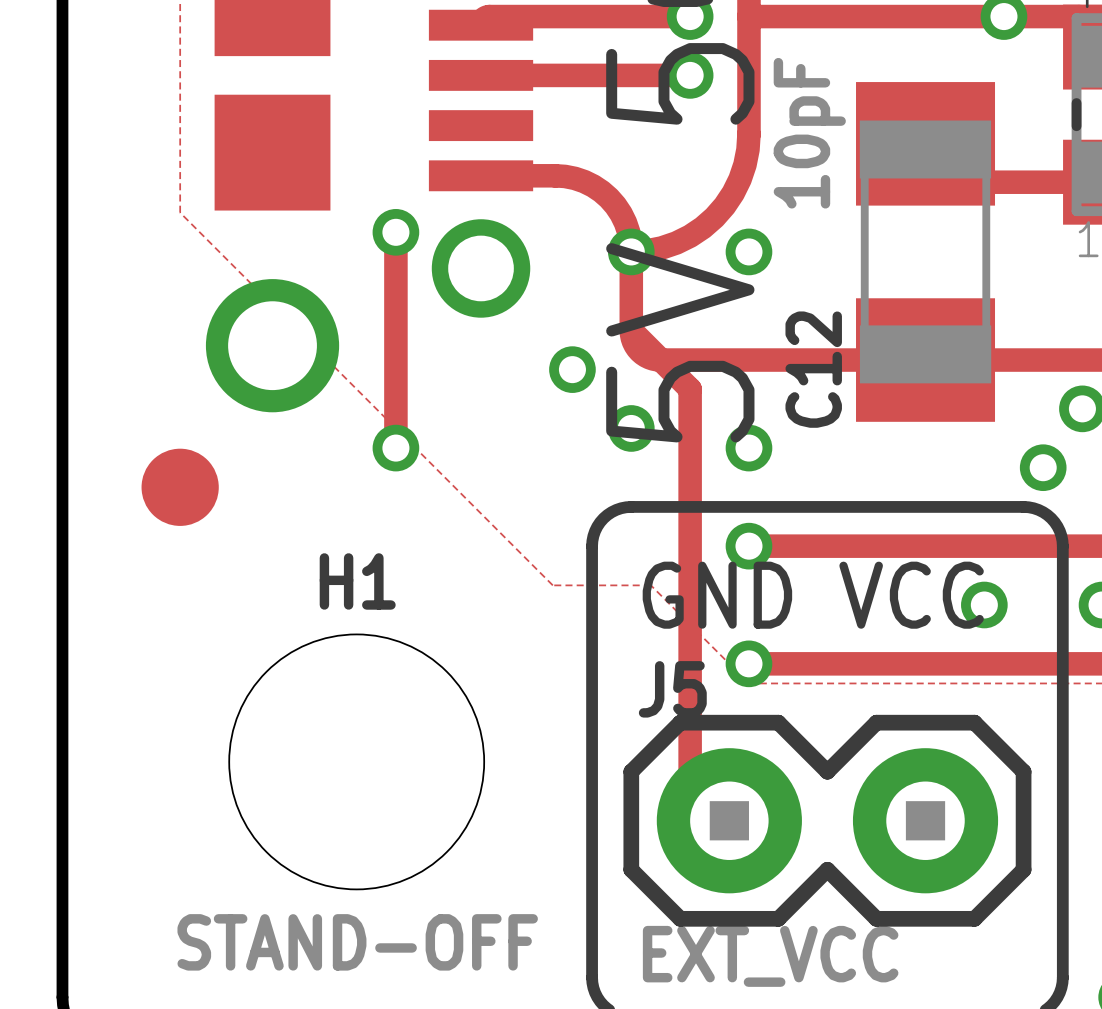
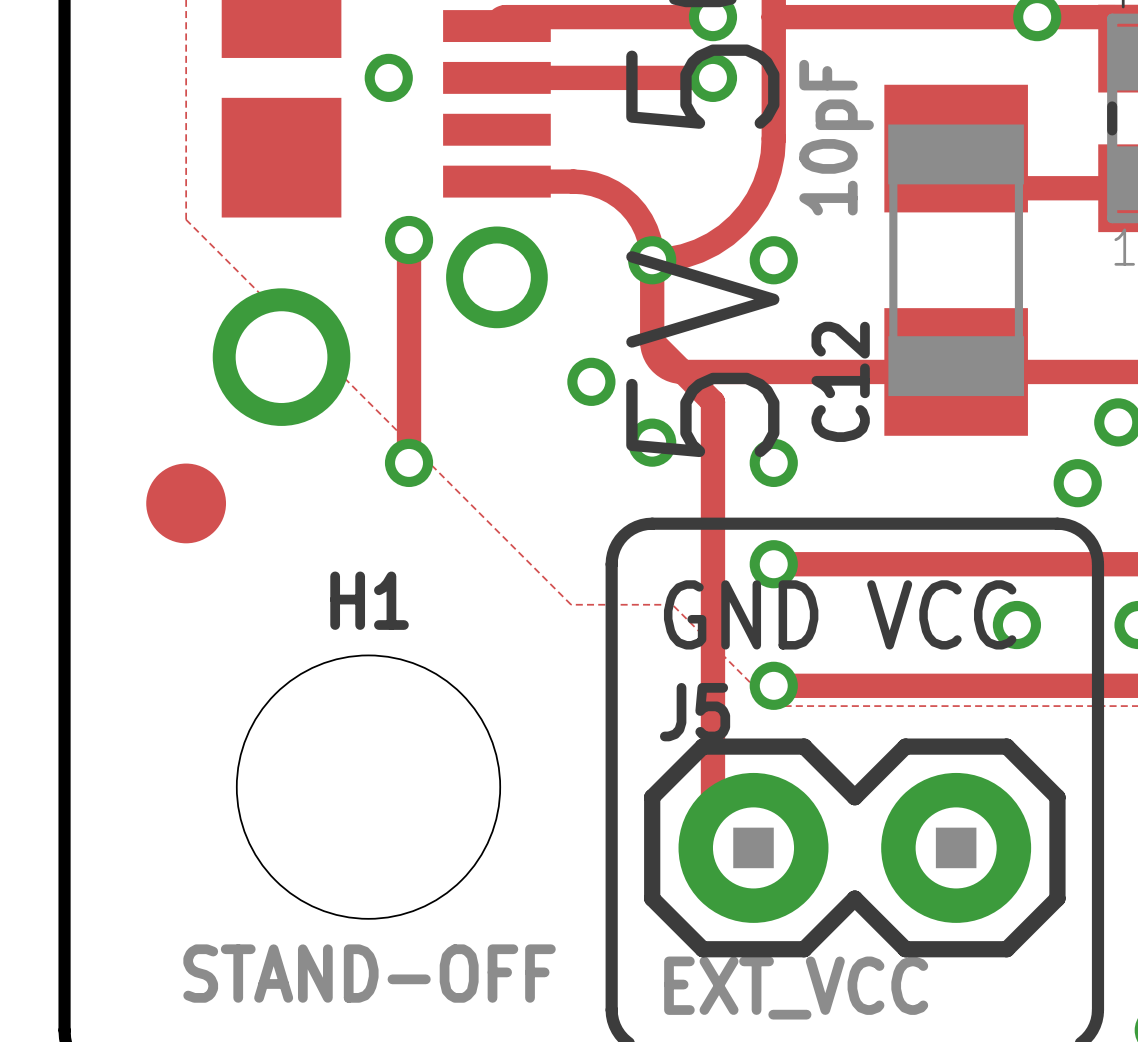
via: none -> (388, 77)

